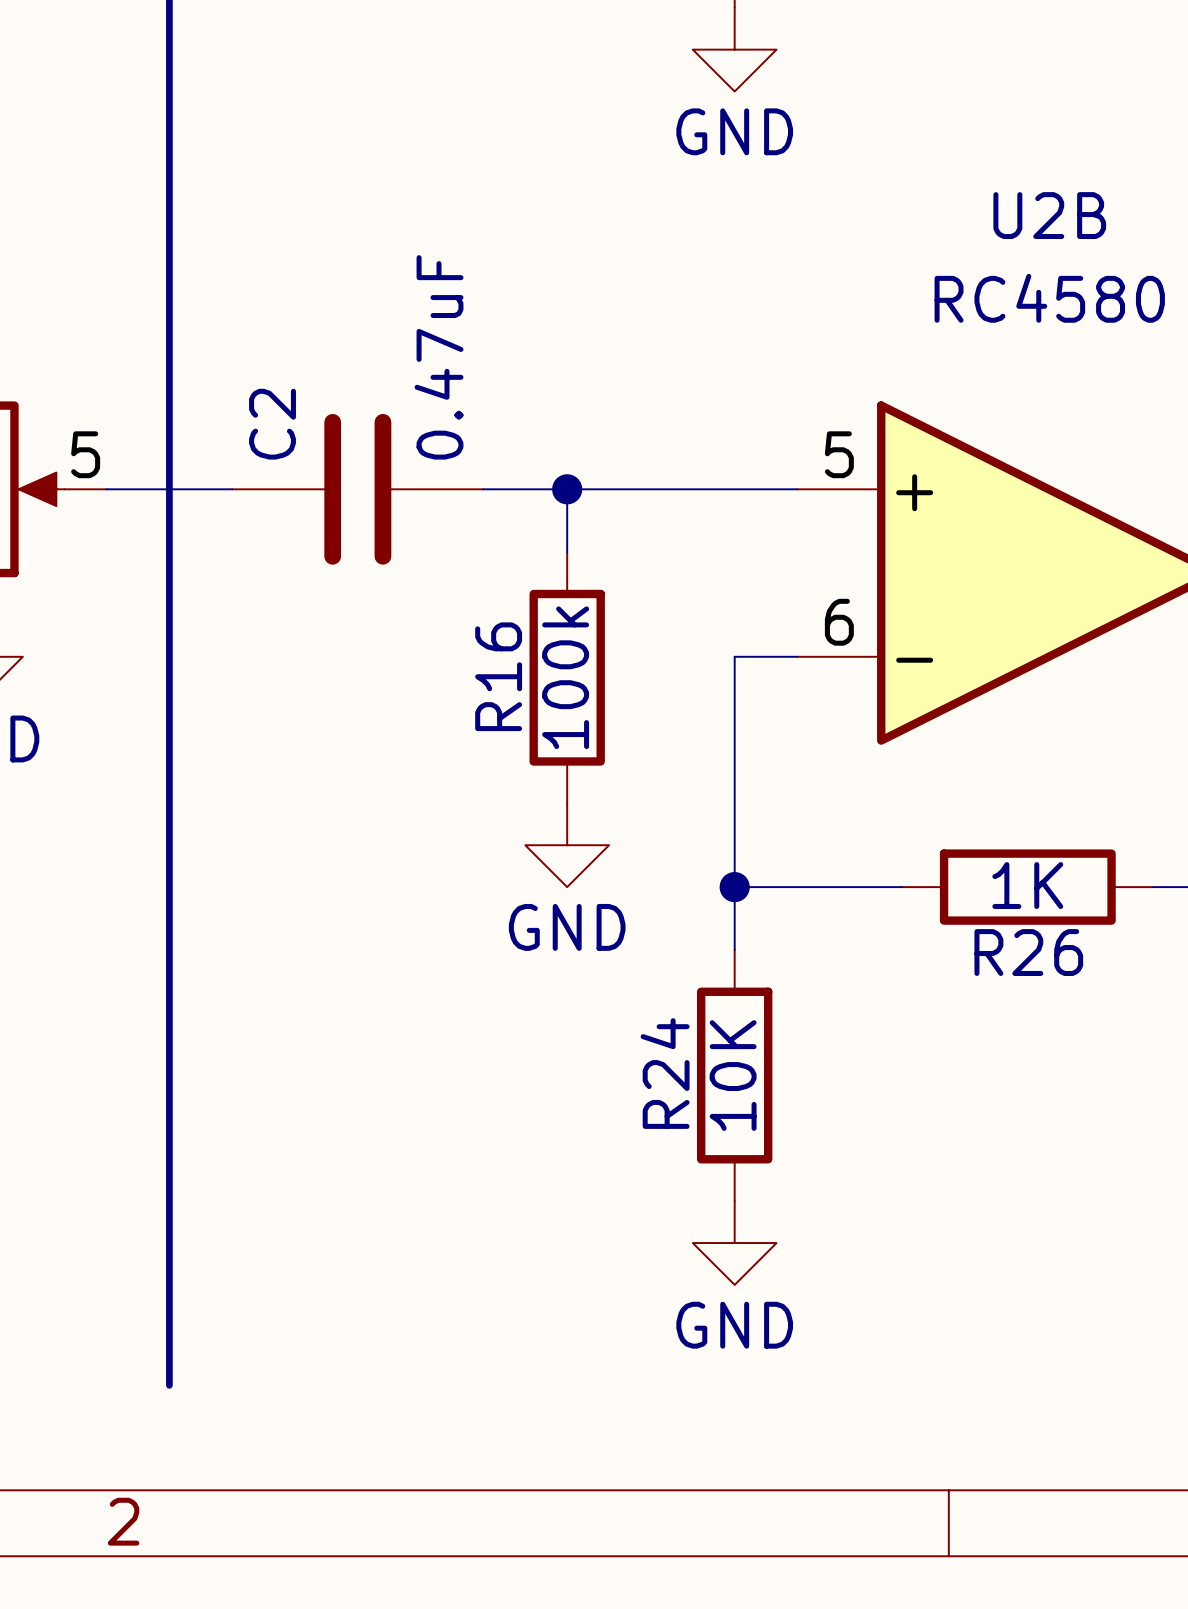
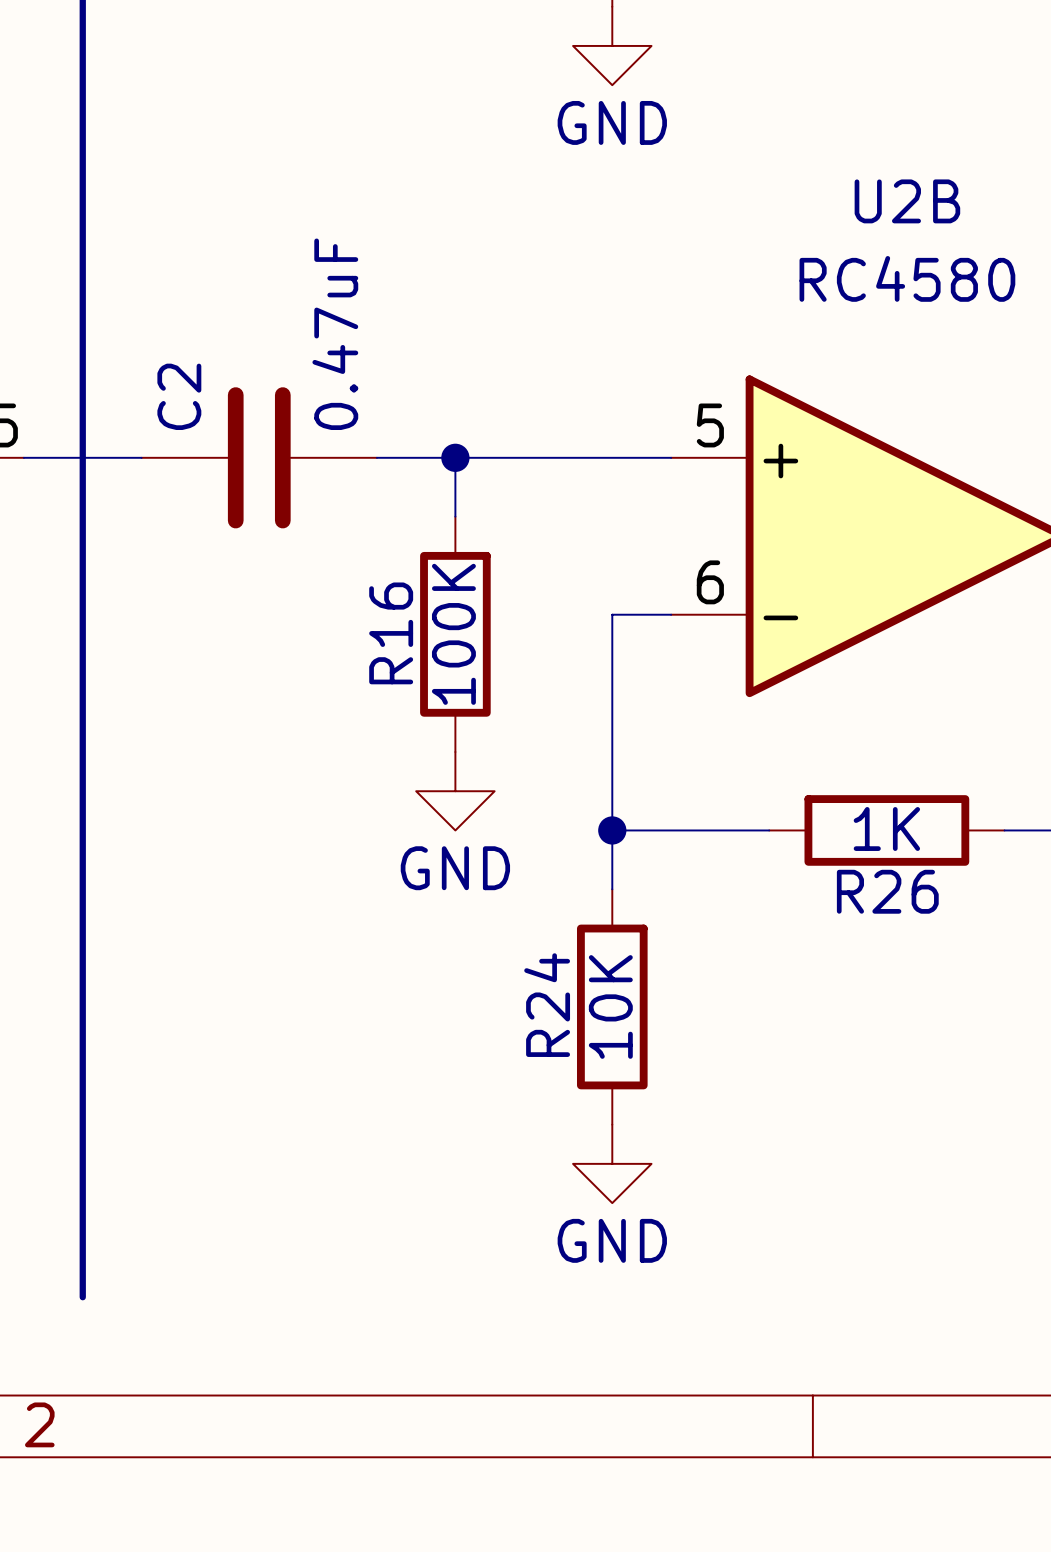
R16 value: 100k (565, 677) -> 100K (453, 634)

